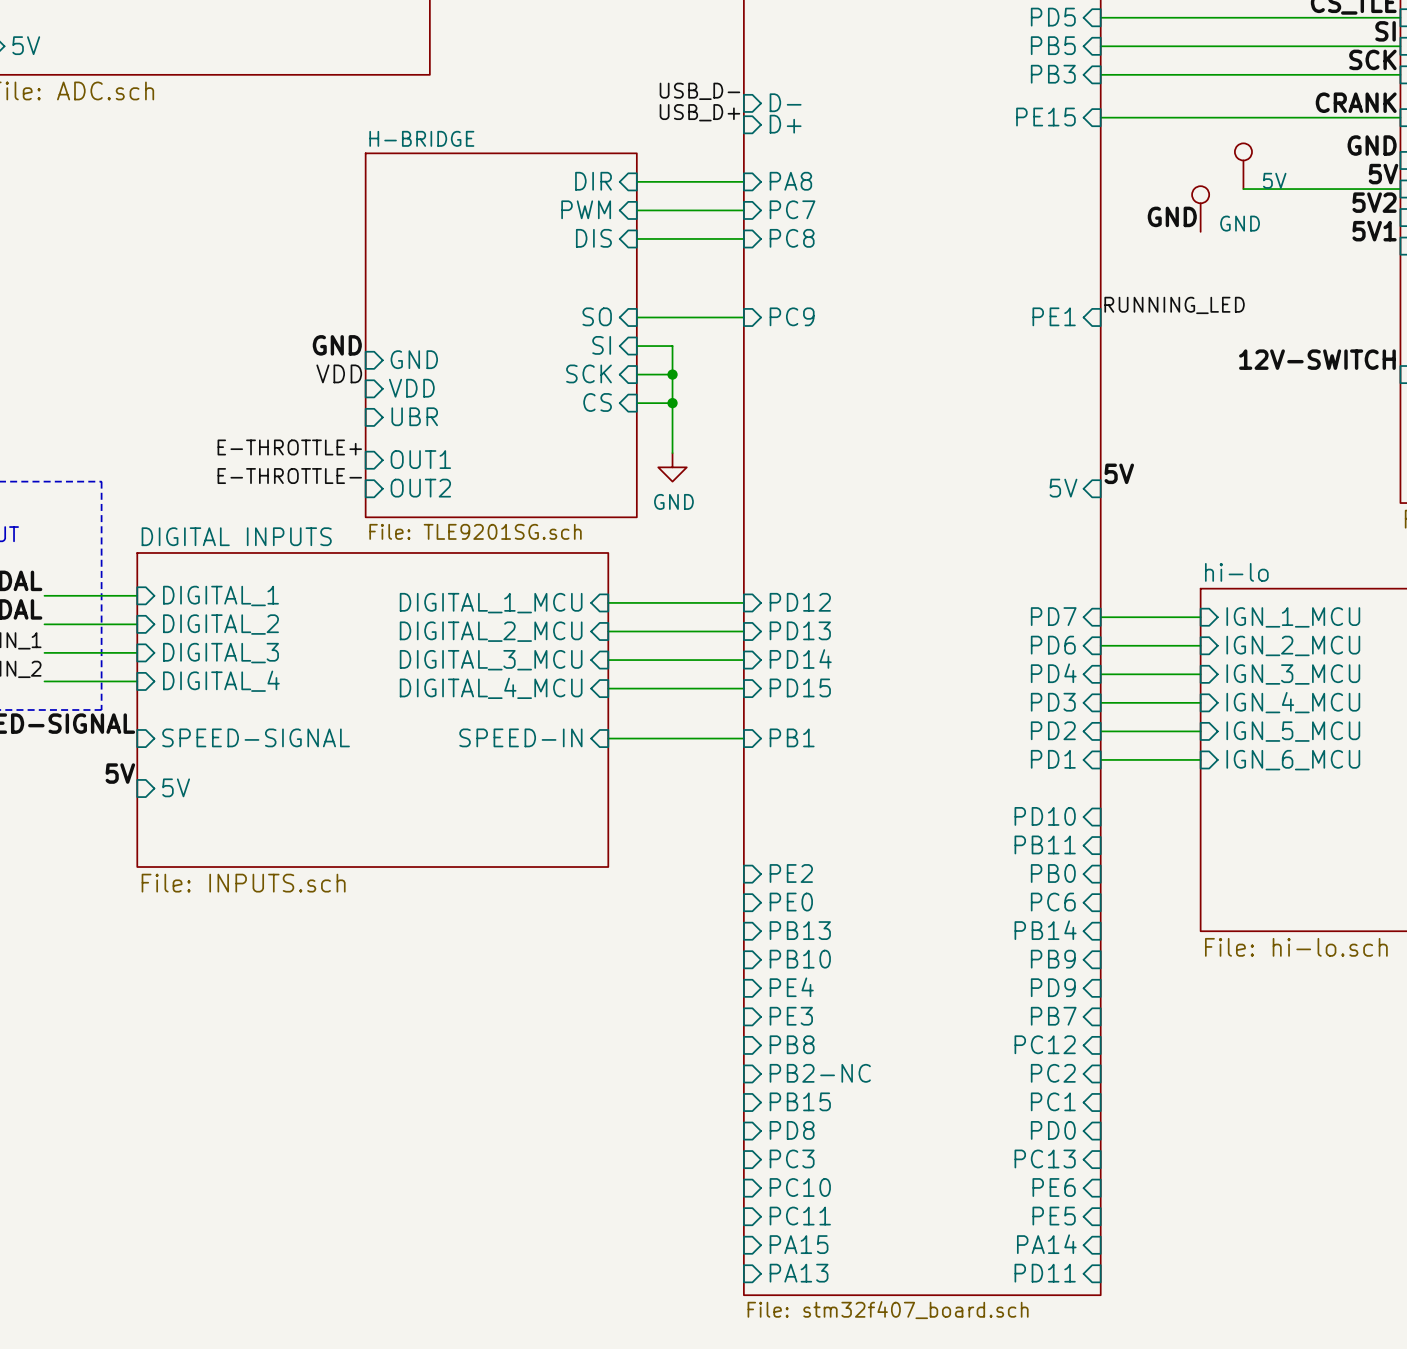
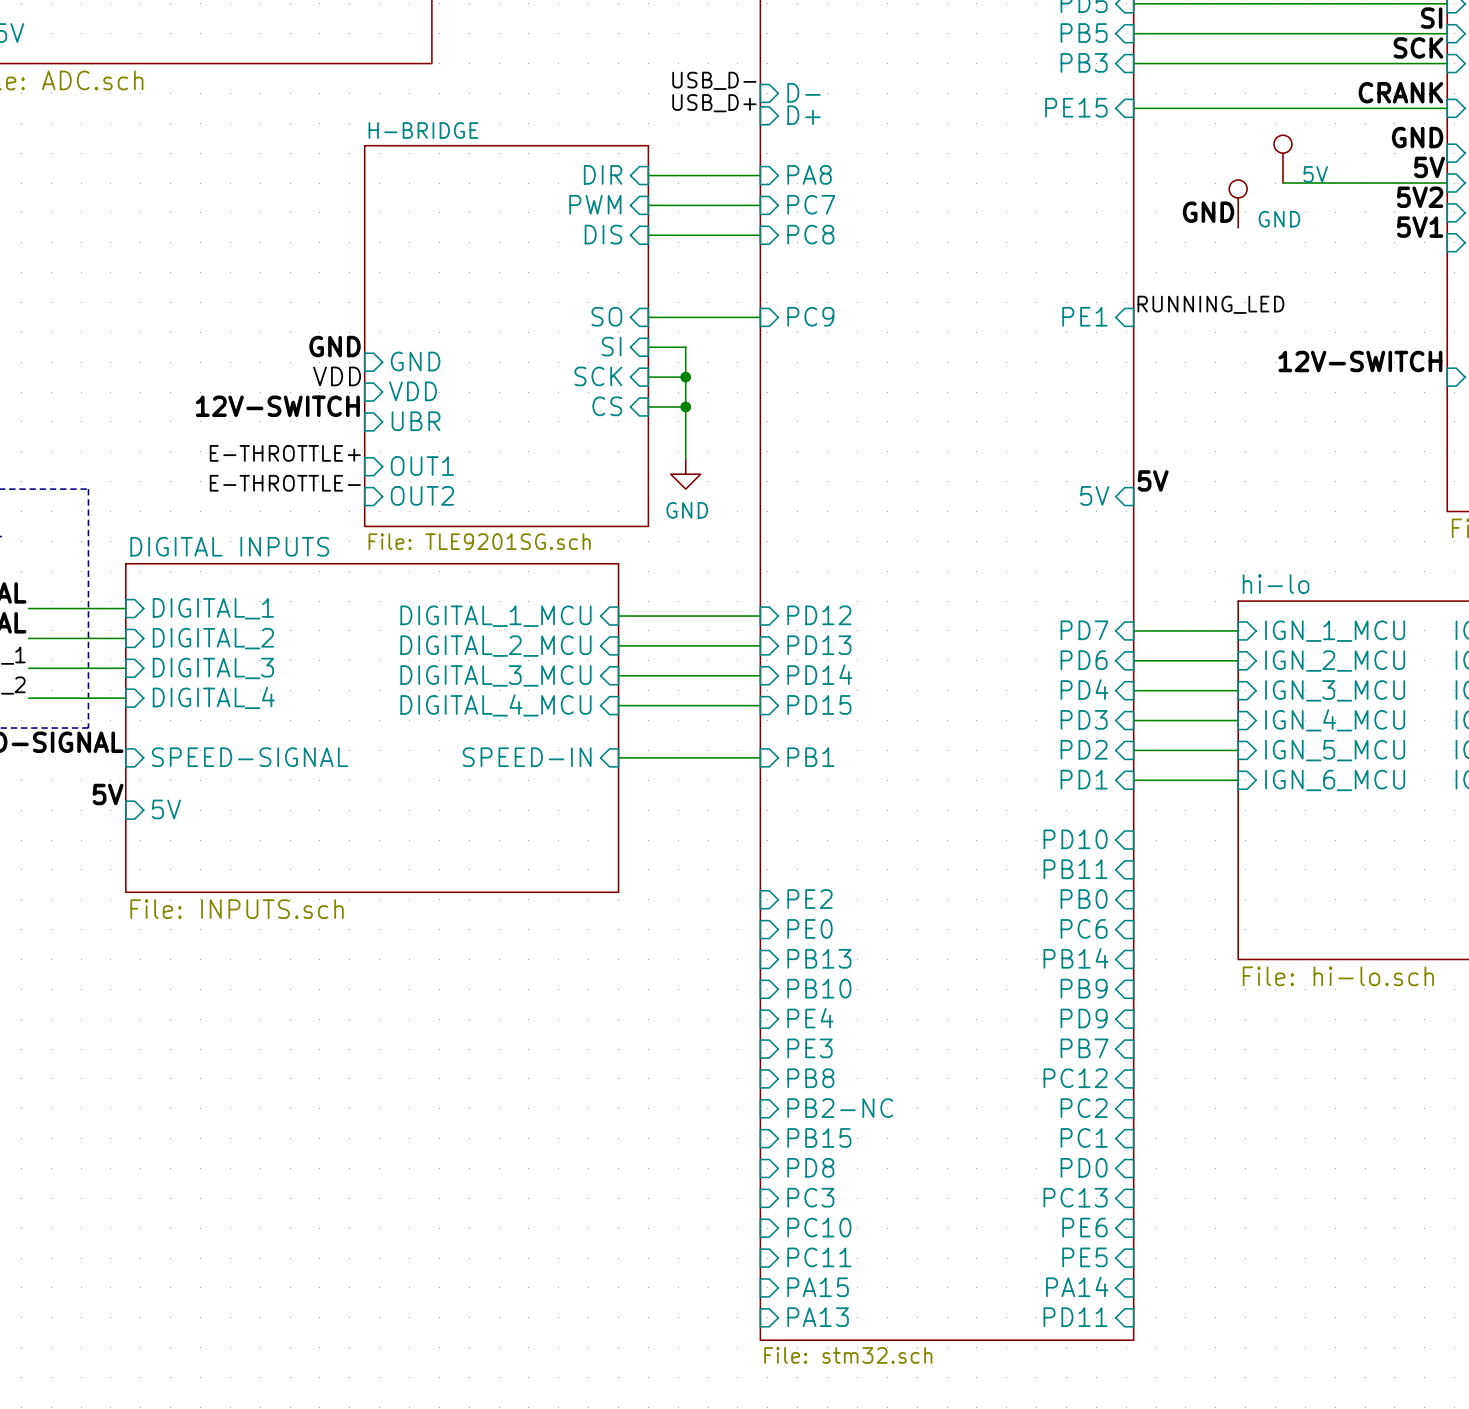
label: none -> 12V-SWITCH (277, 406)
sheet value: File: stm32f407_board.sch (888, 1310) -> File: stm32.sch (848, 1355)

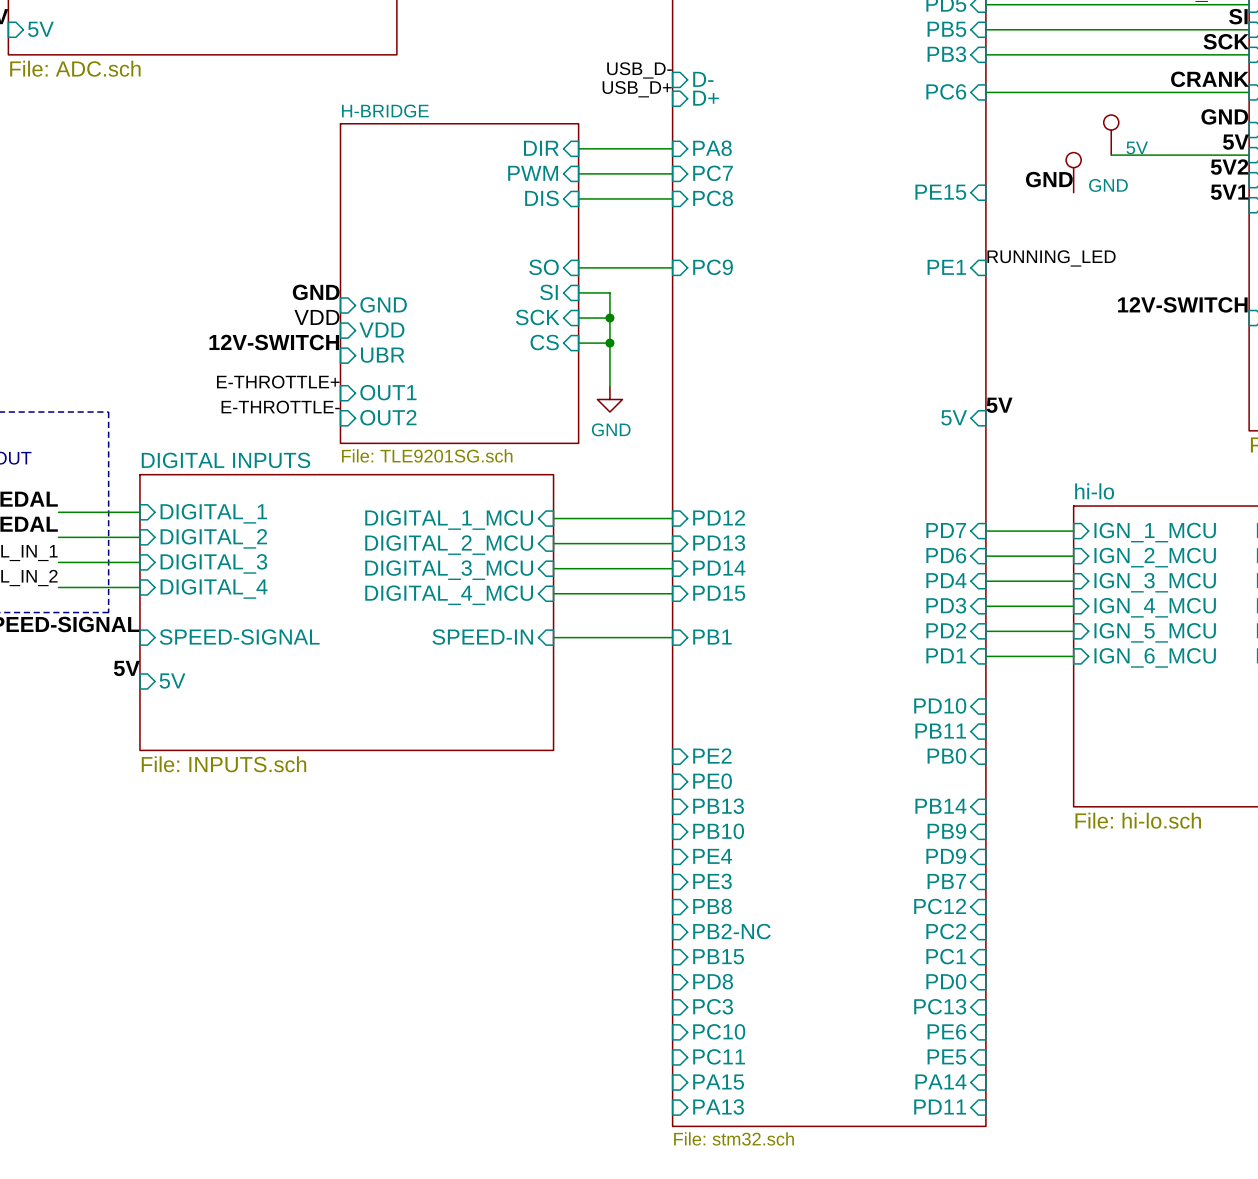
sheet pin: PE15 (1076, 107) -> PC6 (946, 91)
sheet pin: none -> PE15 (940, 192)
sheet pin: PC6 (1084, 928) -> none

